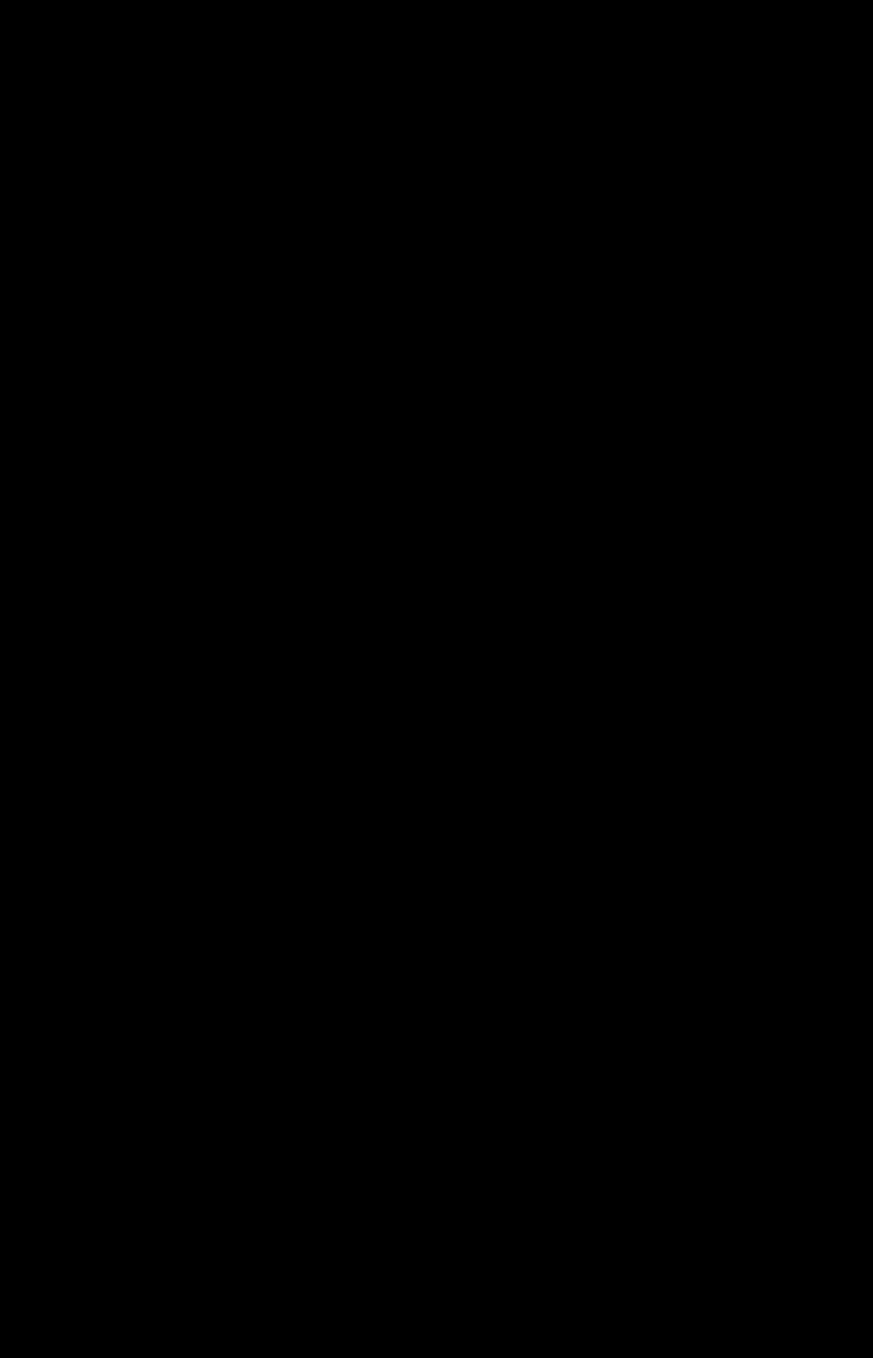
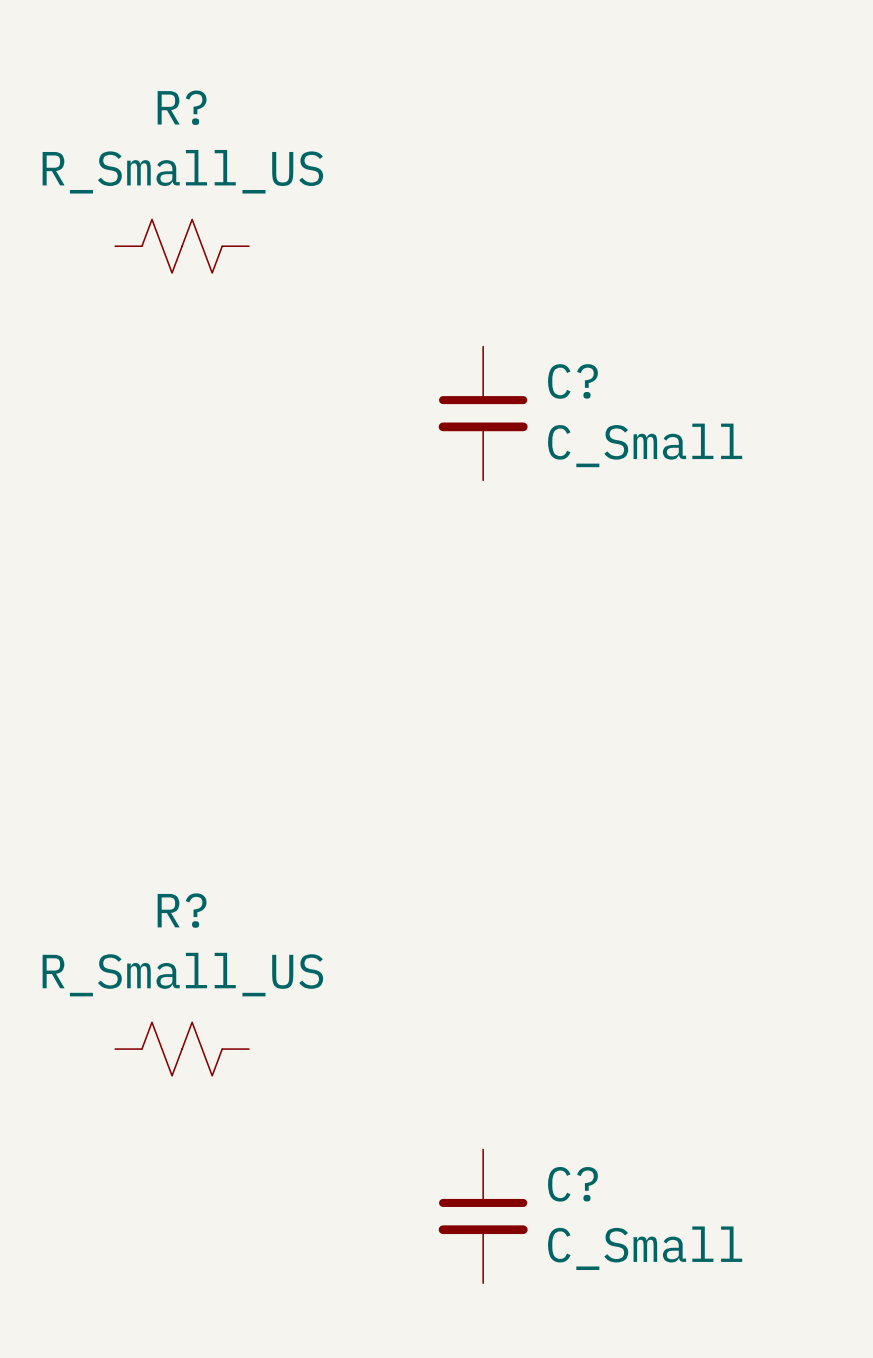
R?: none -> R_Small_US (182, 246)
C?: none -> C_Small (483, 413)
R?: none -> R_Small_US (182, 1049)
C?: none -> C_Small (483, 1216)

